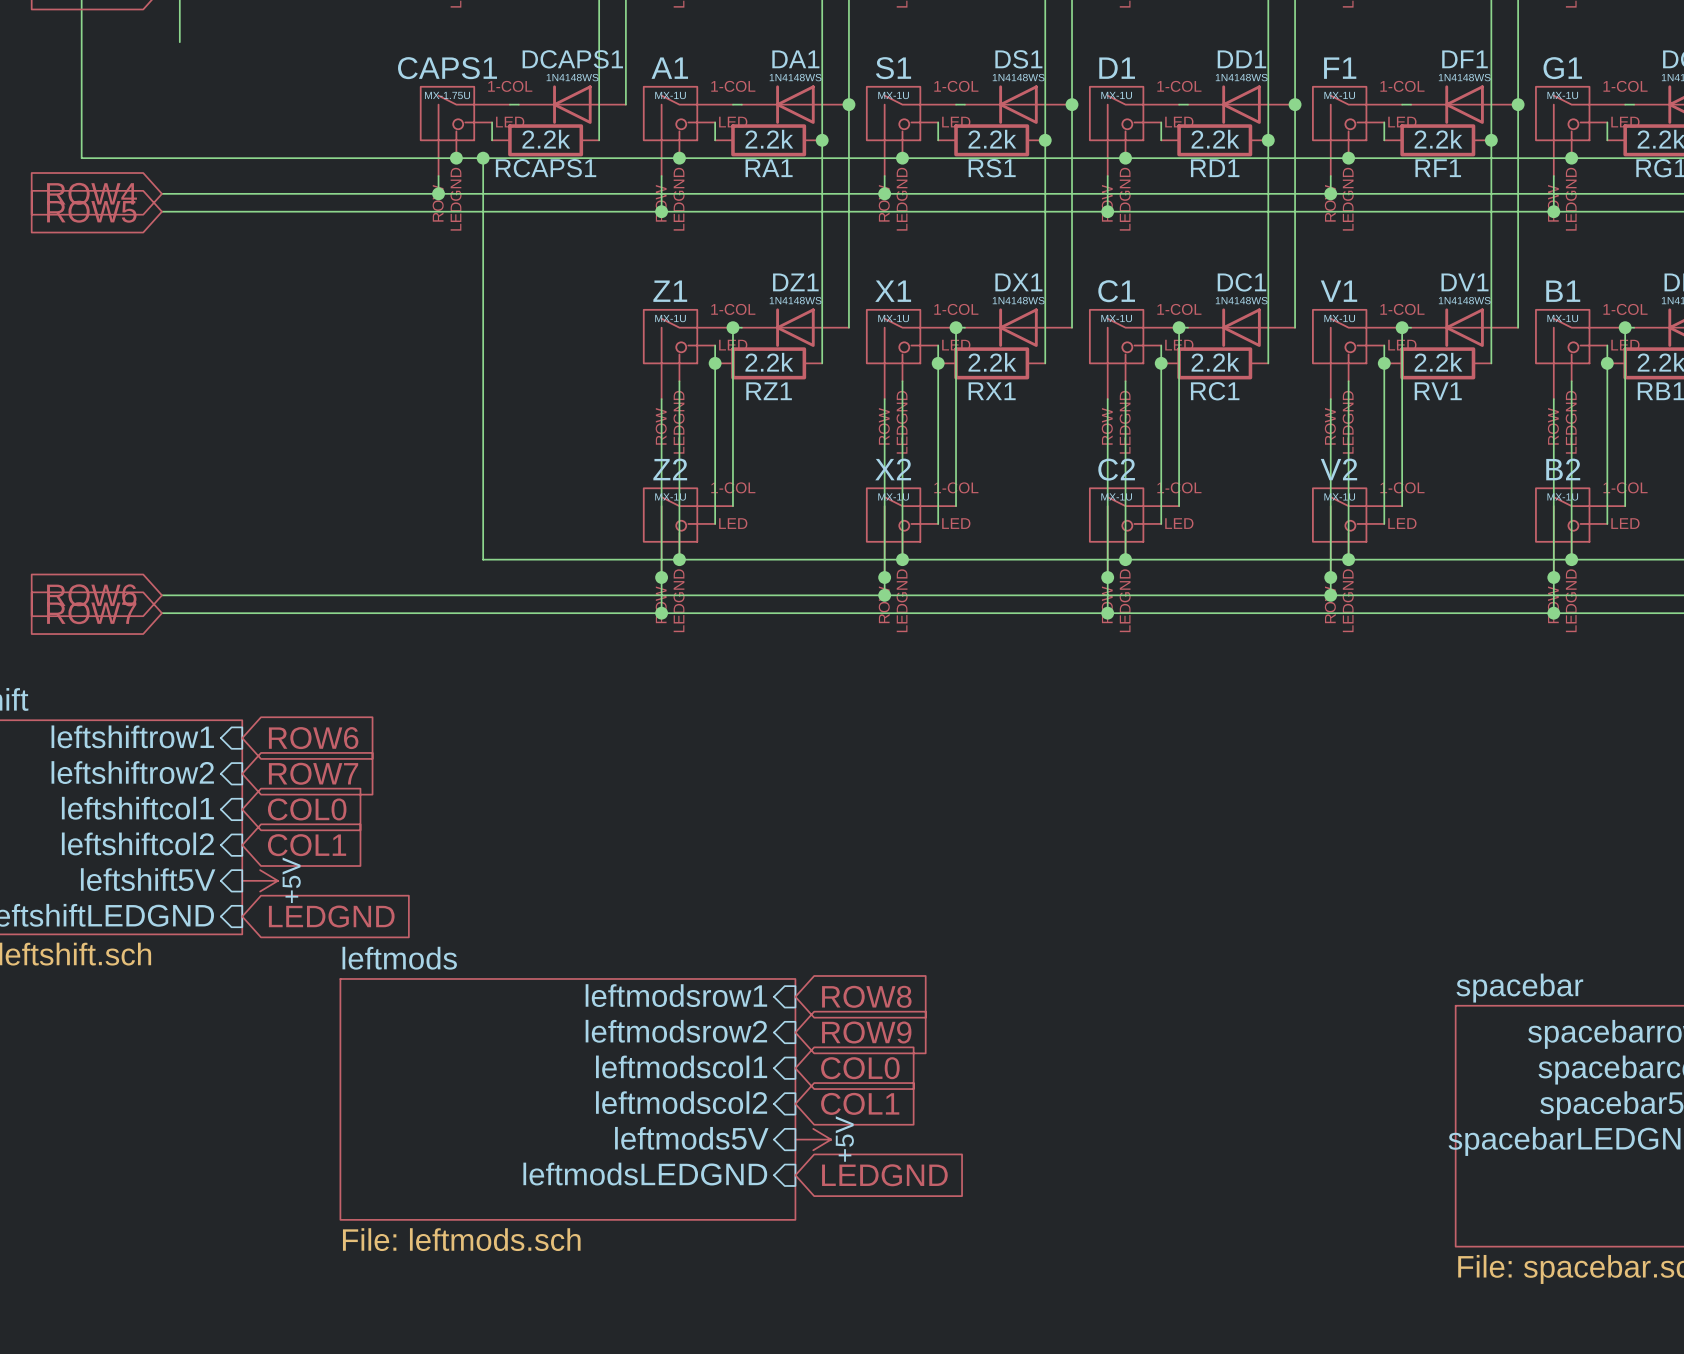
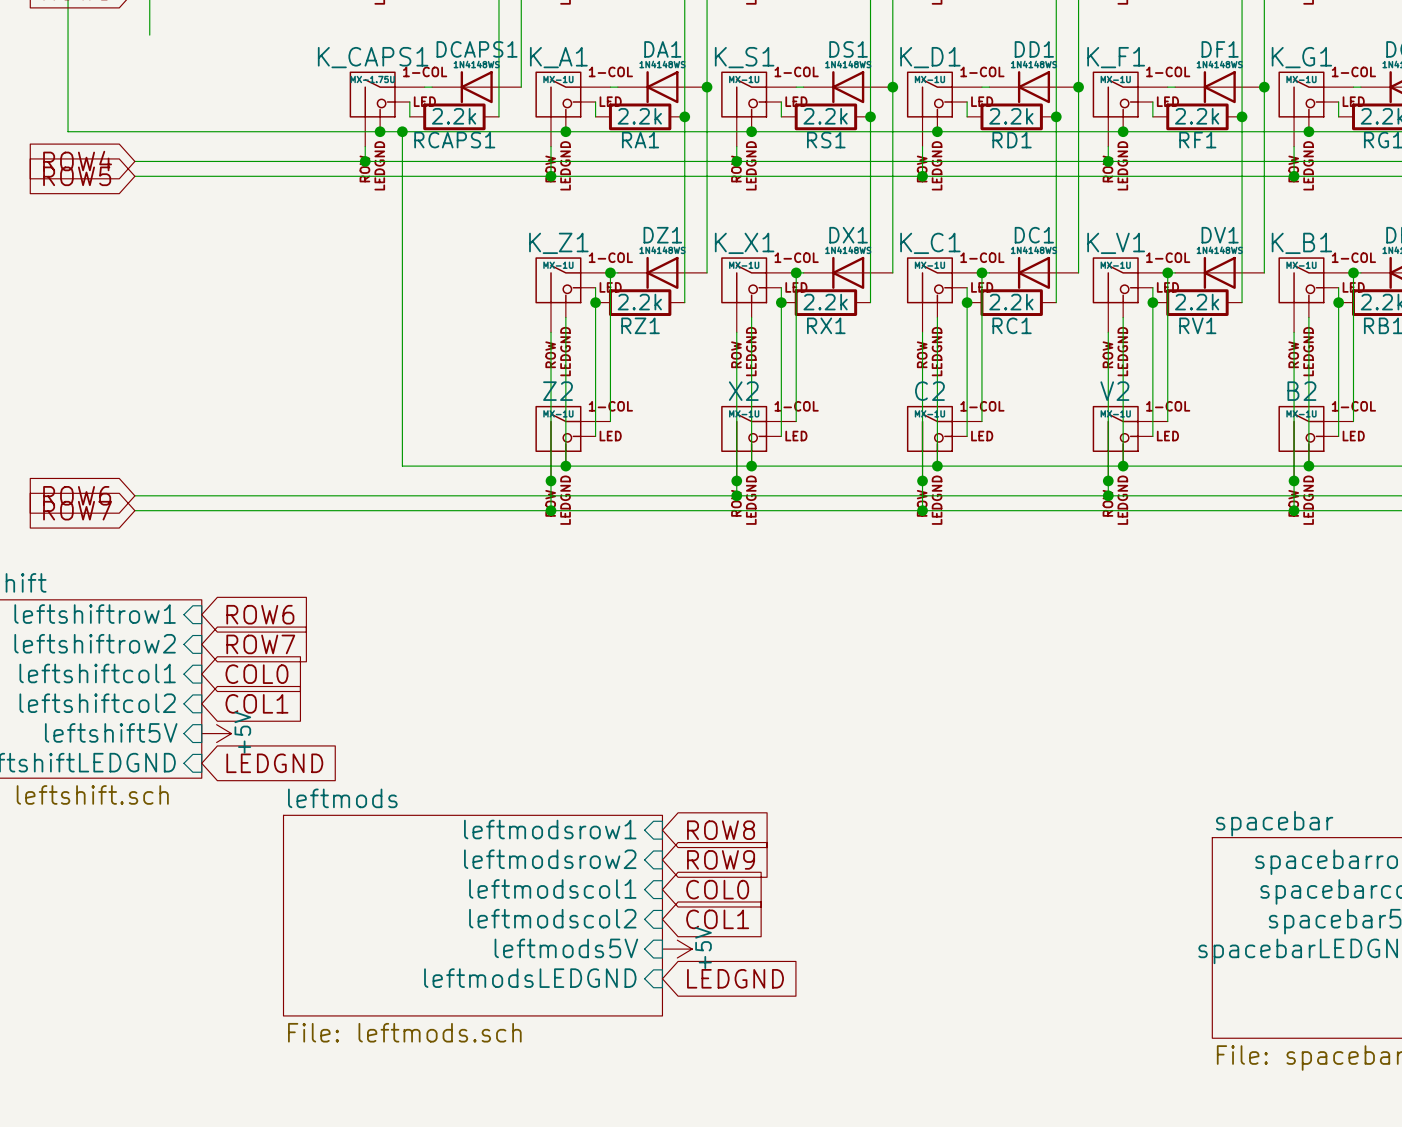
CAPS1 name: CAPS1 (447, 68) -> K_CAPS1 (373, 57)
A1 name: A1 (669, 68) -> K_A1 (558, 57)
S1 name: S1 (893, 68) -> K_S1 (744, 57)
D1 name: D1 (1117, 68) -> K_D1 (930, 57)
F1 name: F1 (1340, 68) -> K_F1 (1116, 57)
G1 name: G1 (1562, 68) -> K_G1 (1301, 57)
Z1 name: Z1 (670, 291) -> K_Z1 (558, 243)
X1 name: X1 (893, 291) -> K_X1 (744, 243)
C1 name: C1 (1116, 291) -> K_C1 (930, 243)
V1 name: V1 (1338, 291) -> K_V1 (1116, 243)
B1 name: B1 (1563, 291) -> K_B1 (1301, 243)

